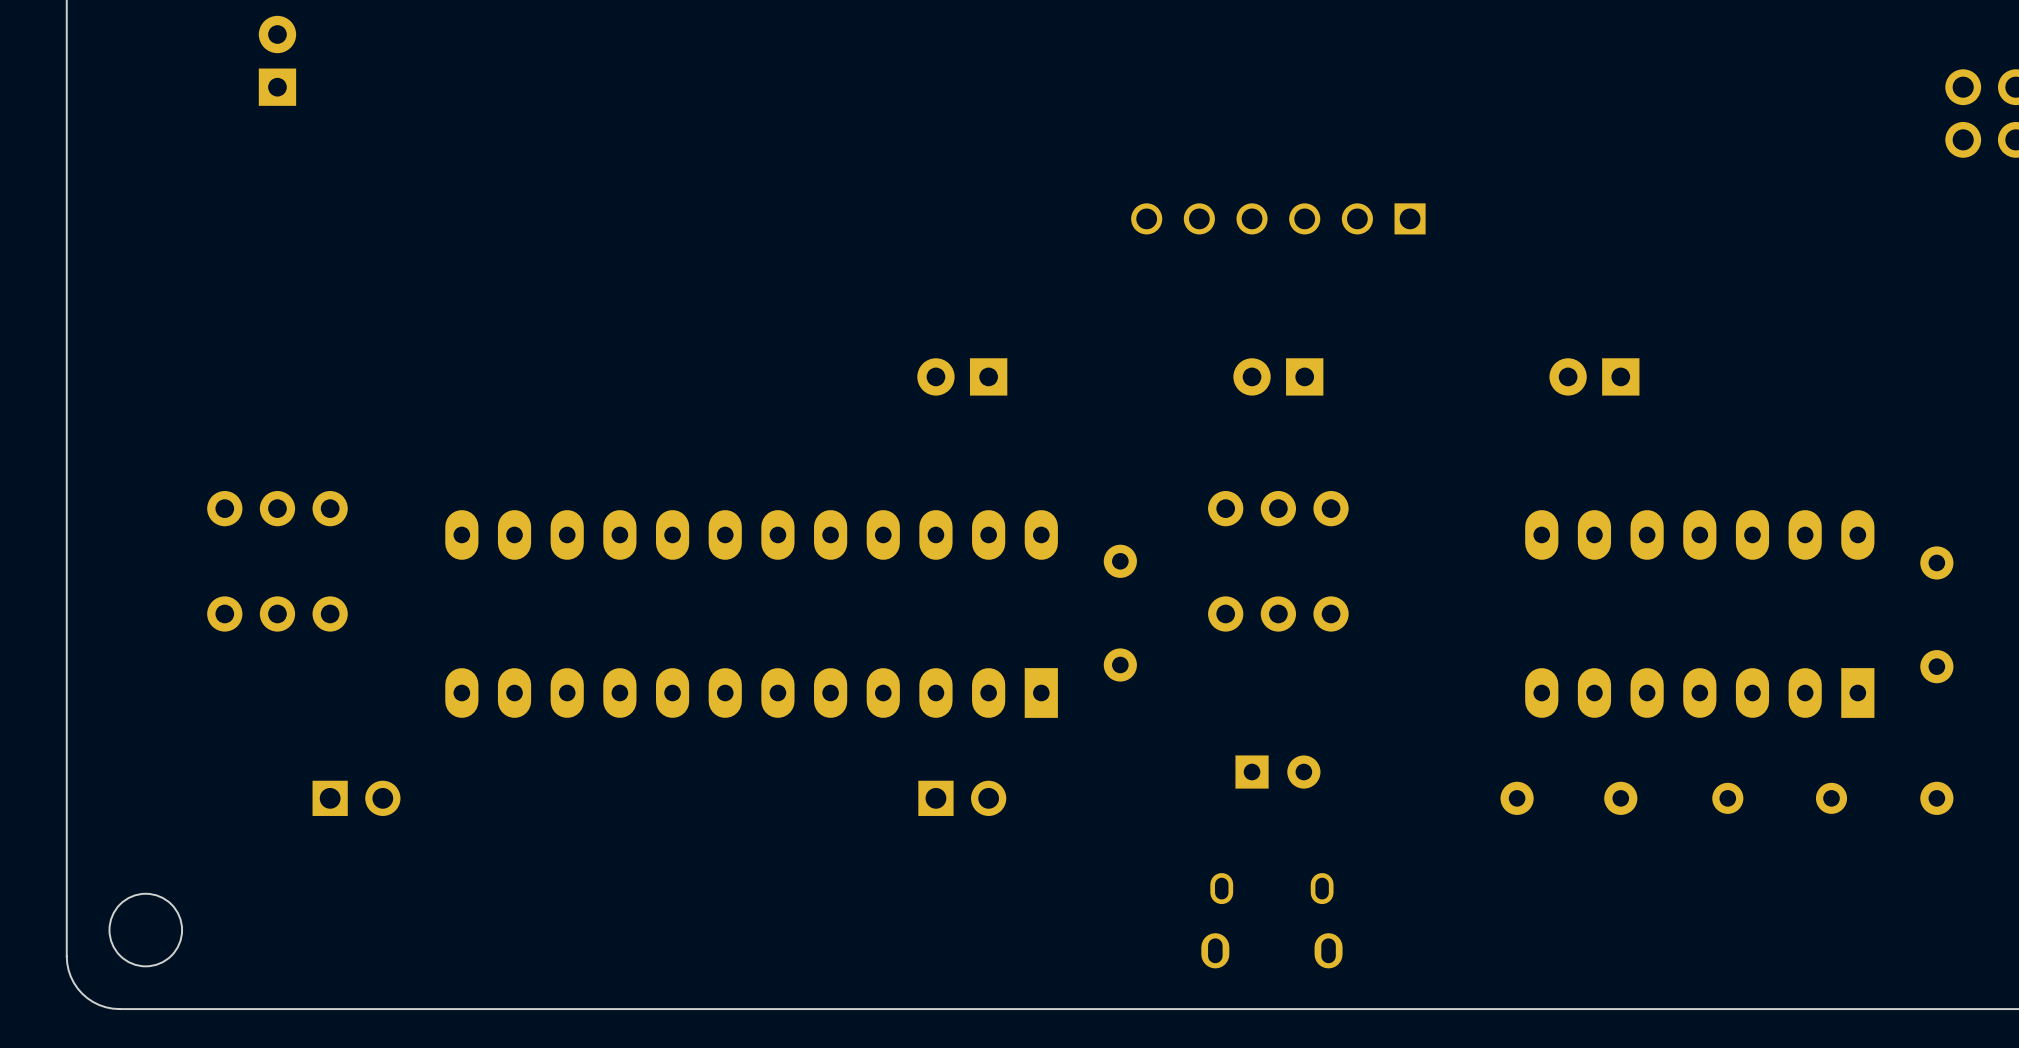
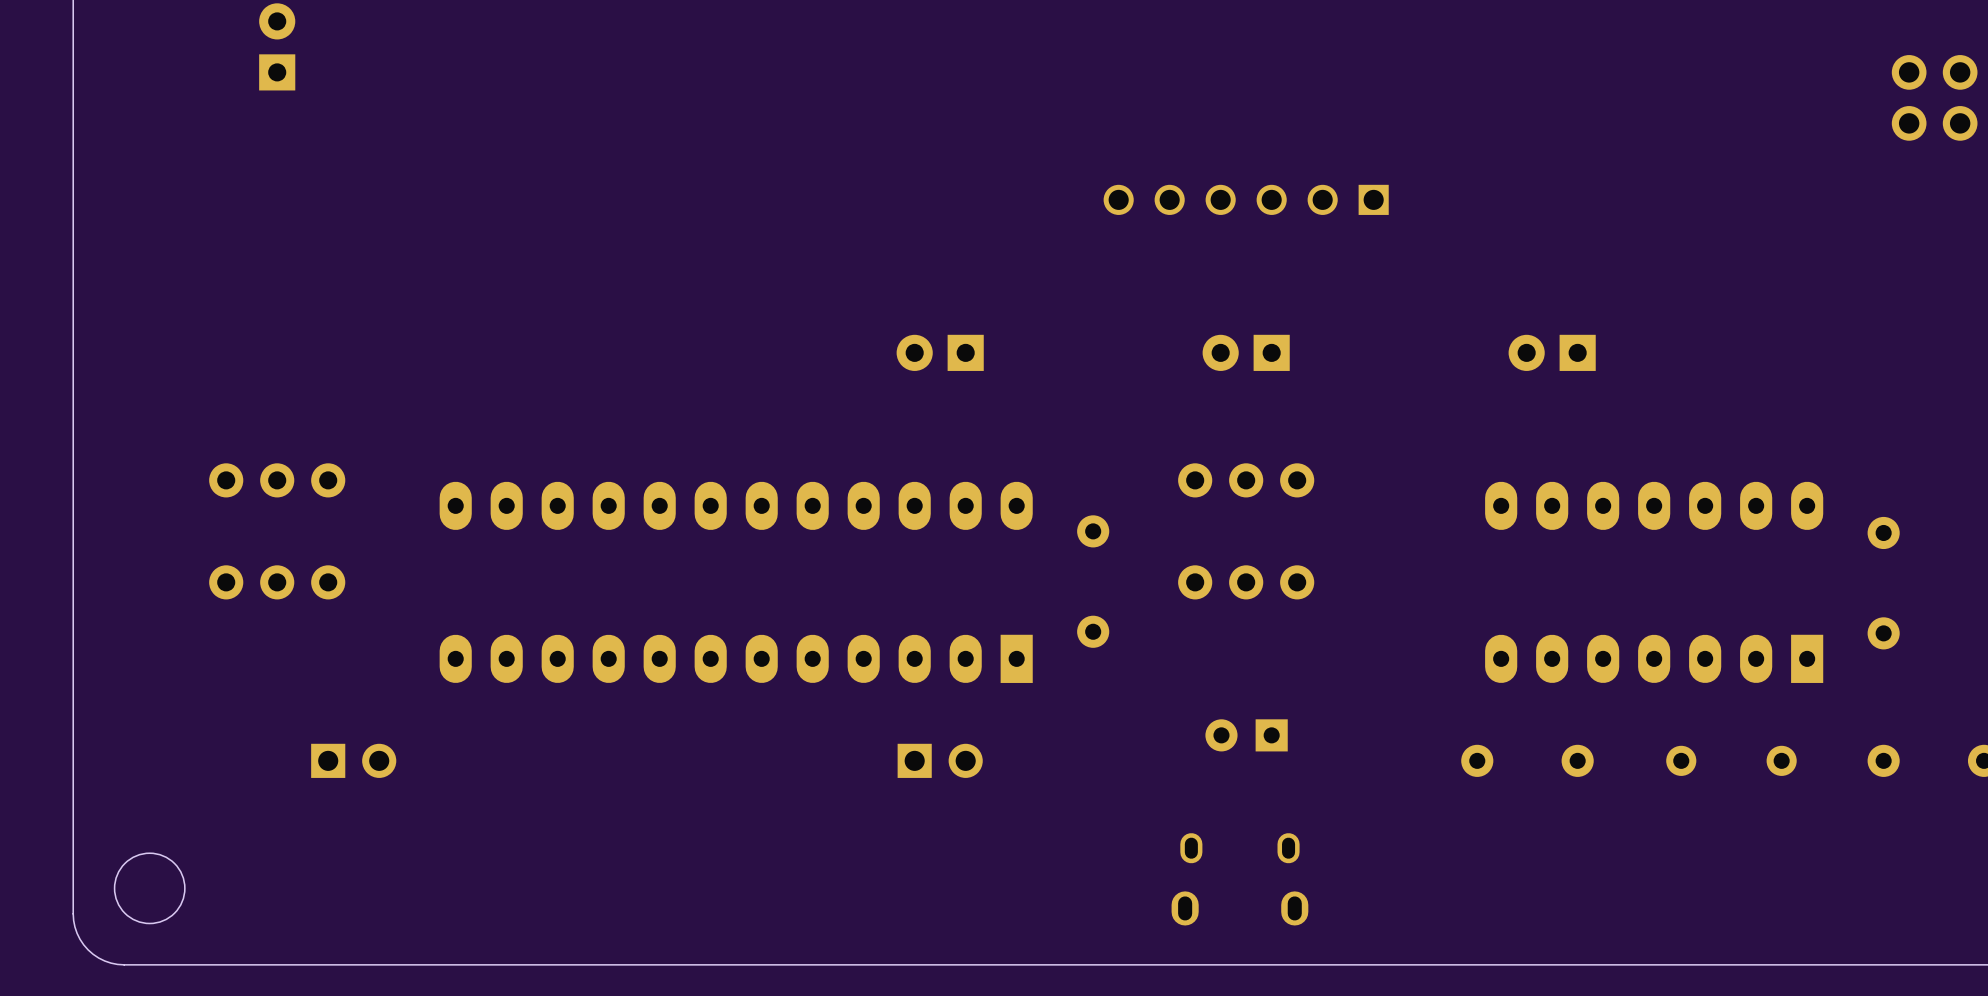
part rotation: 0° (1277, 772) -> 180° (1246, 735)

